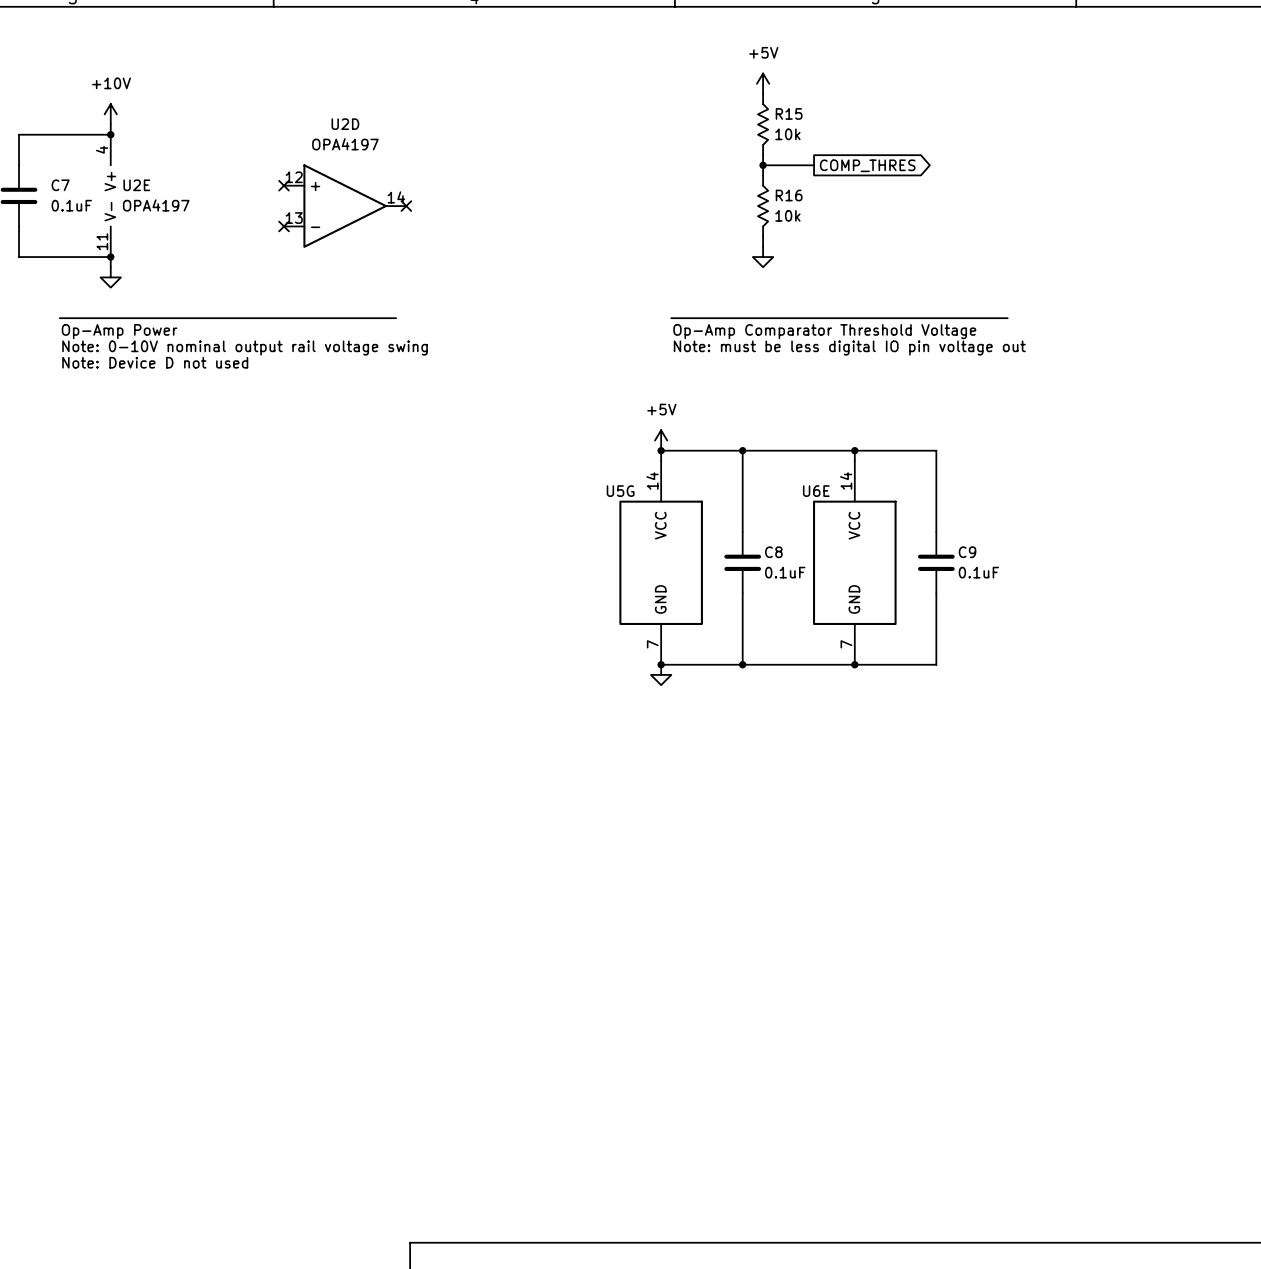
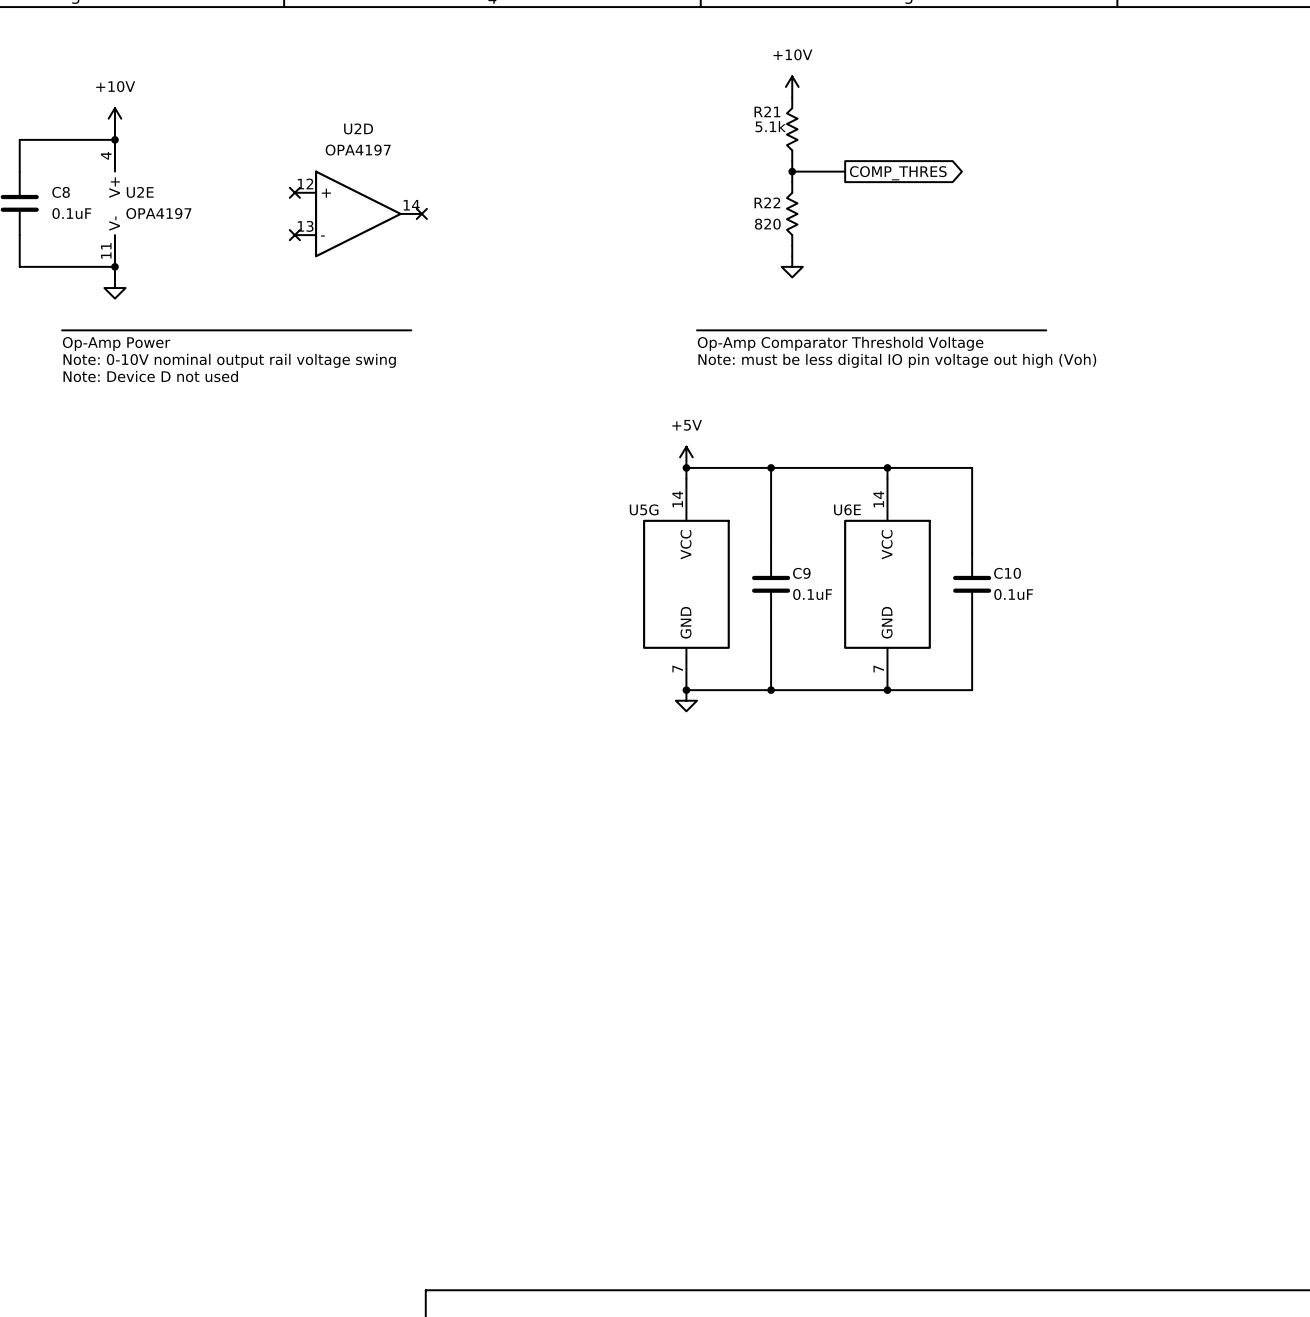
power symbol: +5V (763, 83) -> +10V (792, 86)
R15: 10k (763, 124) -> none
R21: none -> 5.1k (792, 129)
C7 name: C7 (60, 185) -> C8 (61, 192)
R16: 10k (763, 206) -> none
R22: none -> 820 (792, 213)
text: Note: must be less digital IO pin voltage out (849, 348) -> Note: must be less digital IO pin voltage out high (Voh) (897, 360)
C8 name: C8 (773, 552) -> C9 (801, 573)
C9 name: C9 (967, 552) -> C10 (1007, 573)

